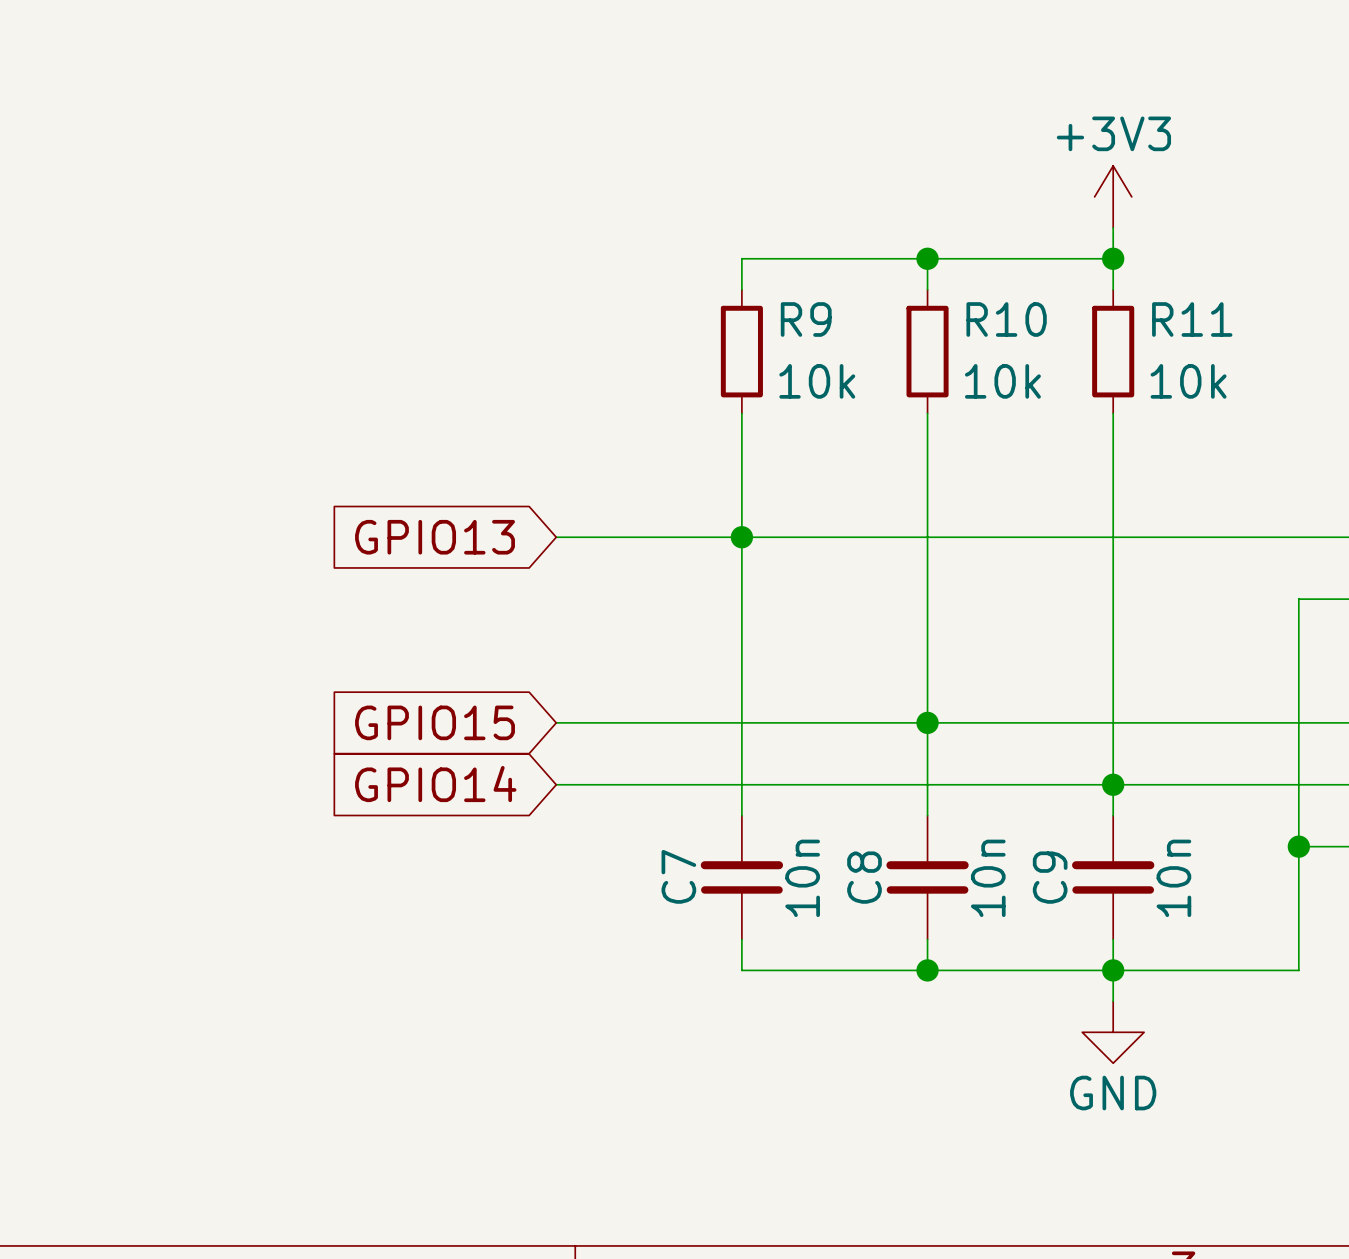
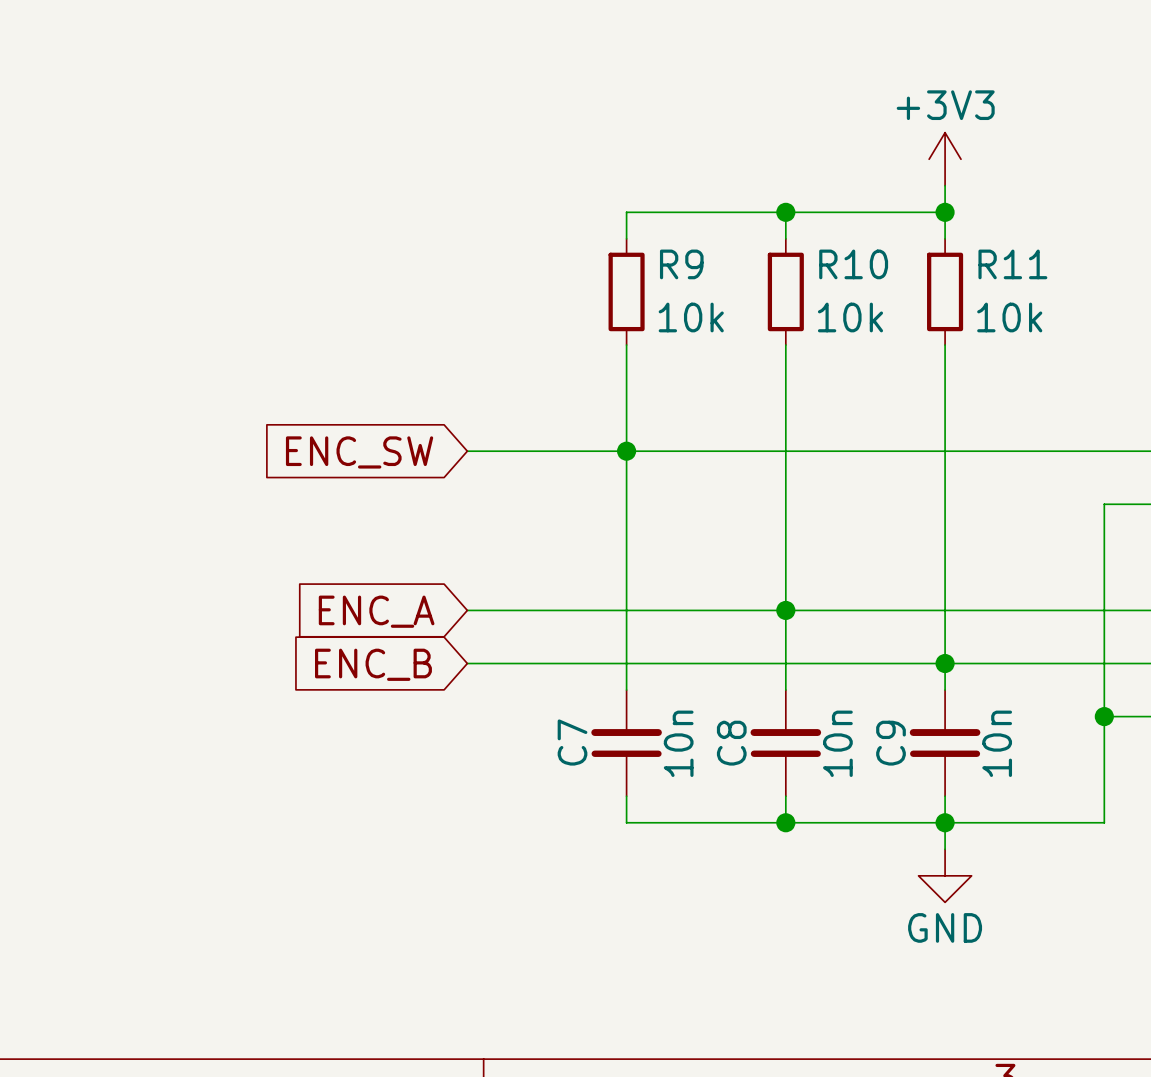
global label: GPIO13 (435, 537) -> ENC_SW (359, 452)
global label: GPIO15 (435, 722) -> ENC_A (376, 611)
global label: GPIO14 (435, 784) -> ENC_B (373, 664)

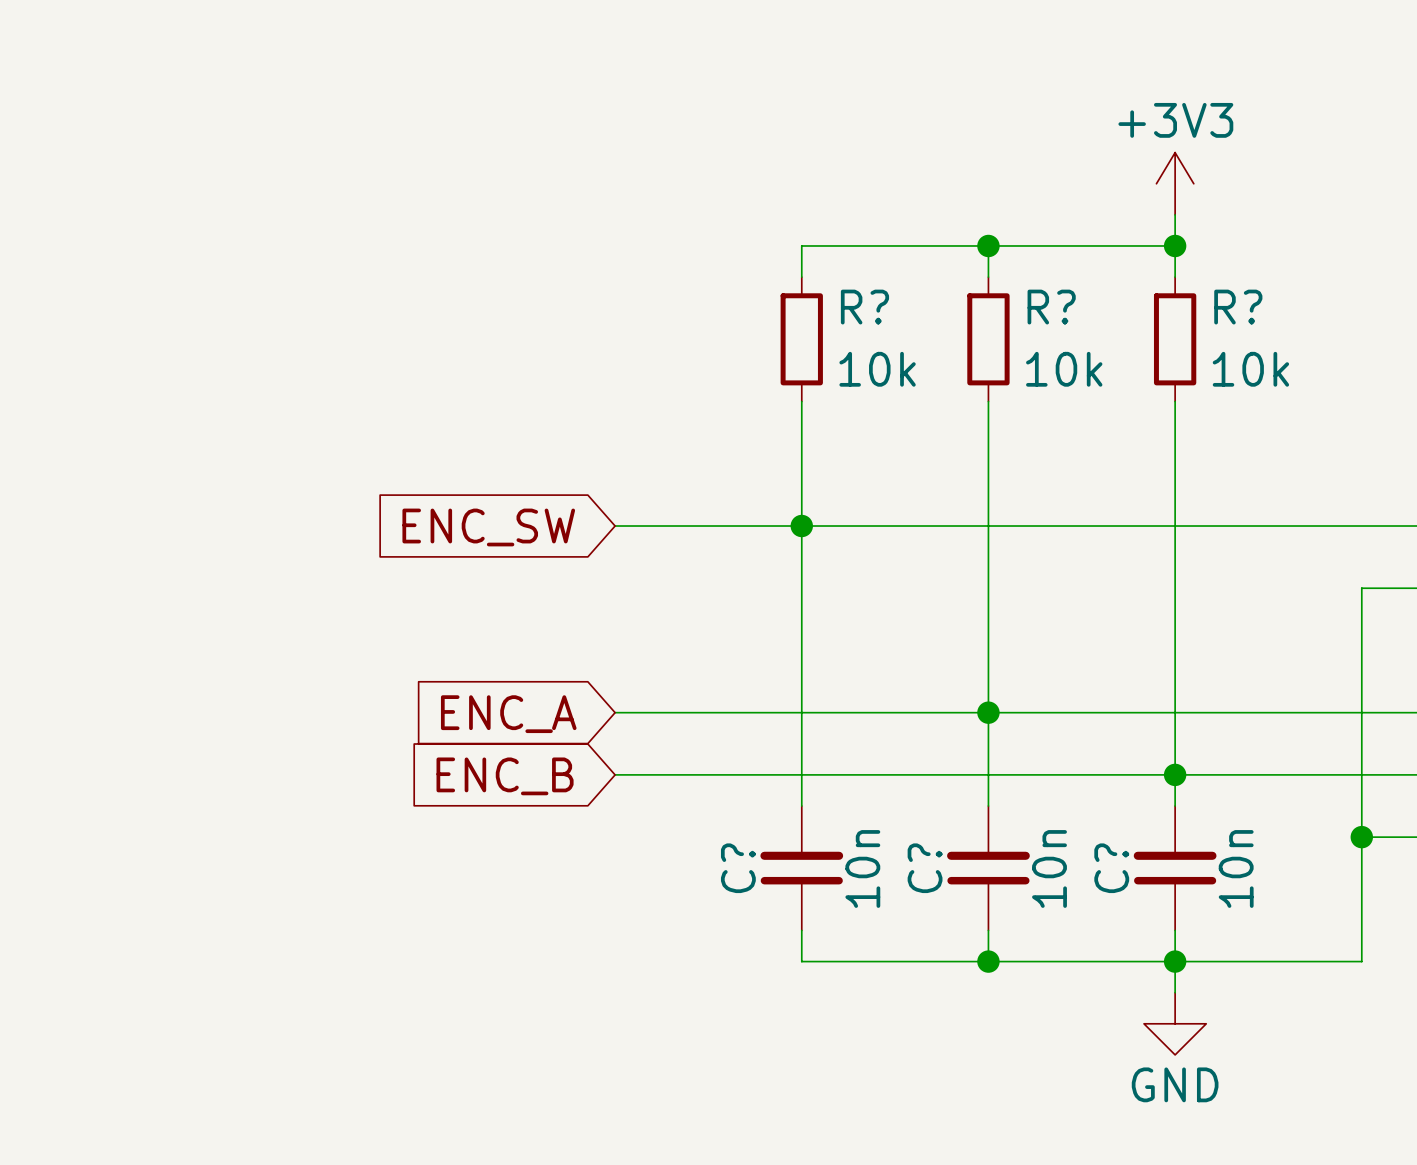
R9 name: R9 (681, 264) -> R? (864, 307)
R10 name: R10 (853, 264) -> R? (1051, 307)
R11 name: R11 (1012, 264) -> R? (1238, 307)
C7 name: C7 (572, 742) -> C? (738, 868)
C8 name: C8 (731, 743) -> C? (925, 868)
C9 name: C9 (891, 743) -> C? (1111, 868)

